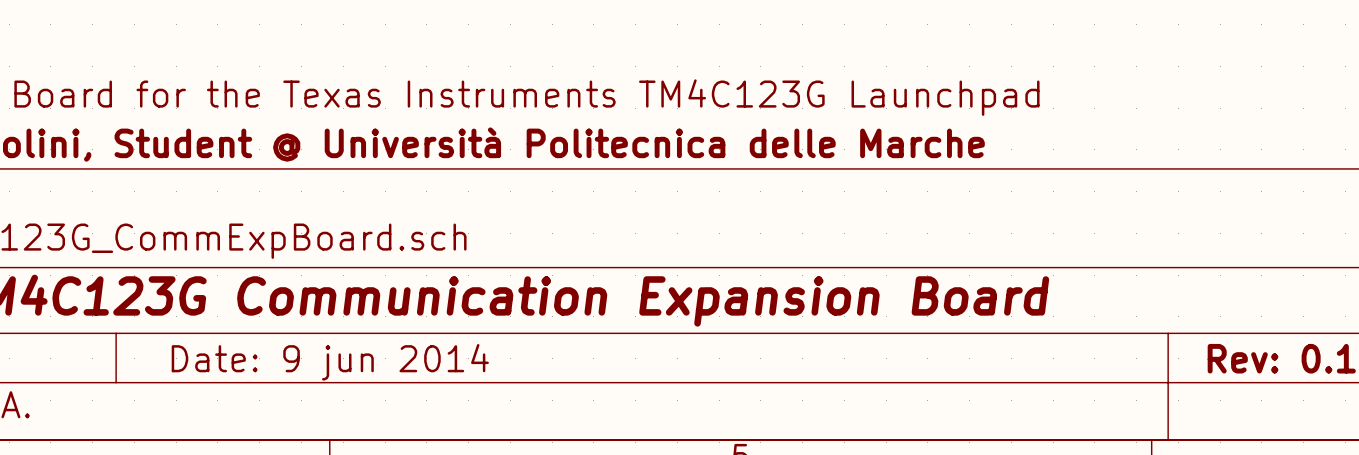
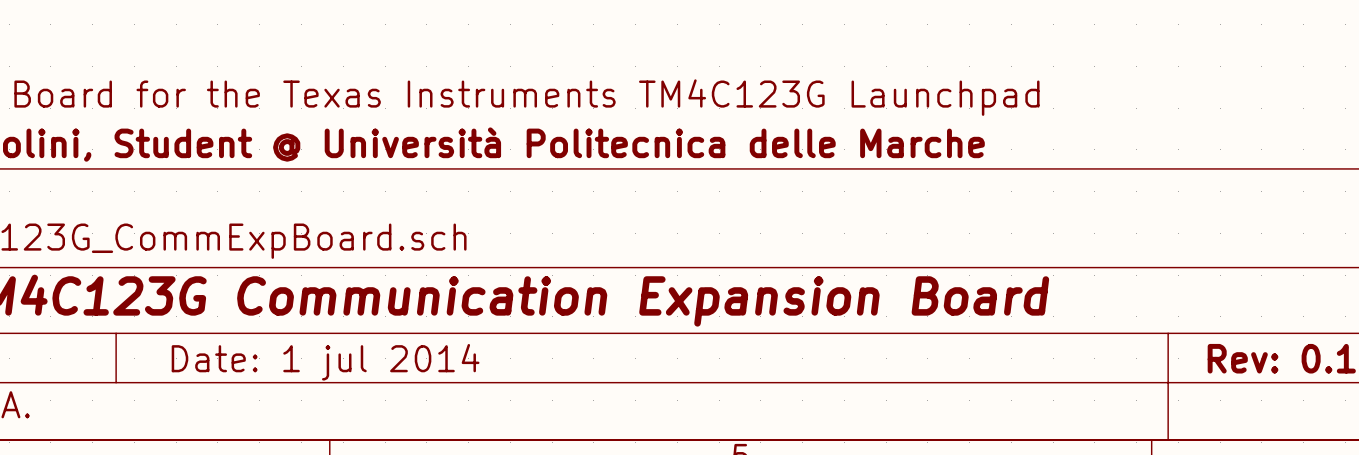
title block: Date: 9 jun 2014 (330, 362) -> Date: 1 jul 2014 (325, 362)

